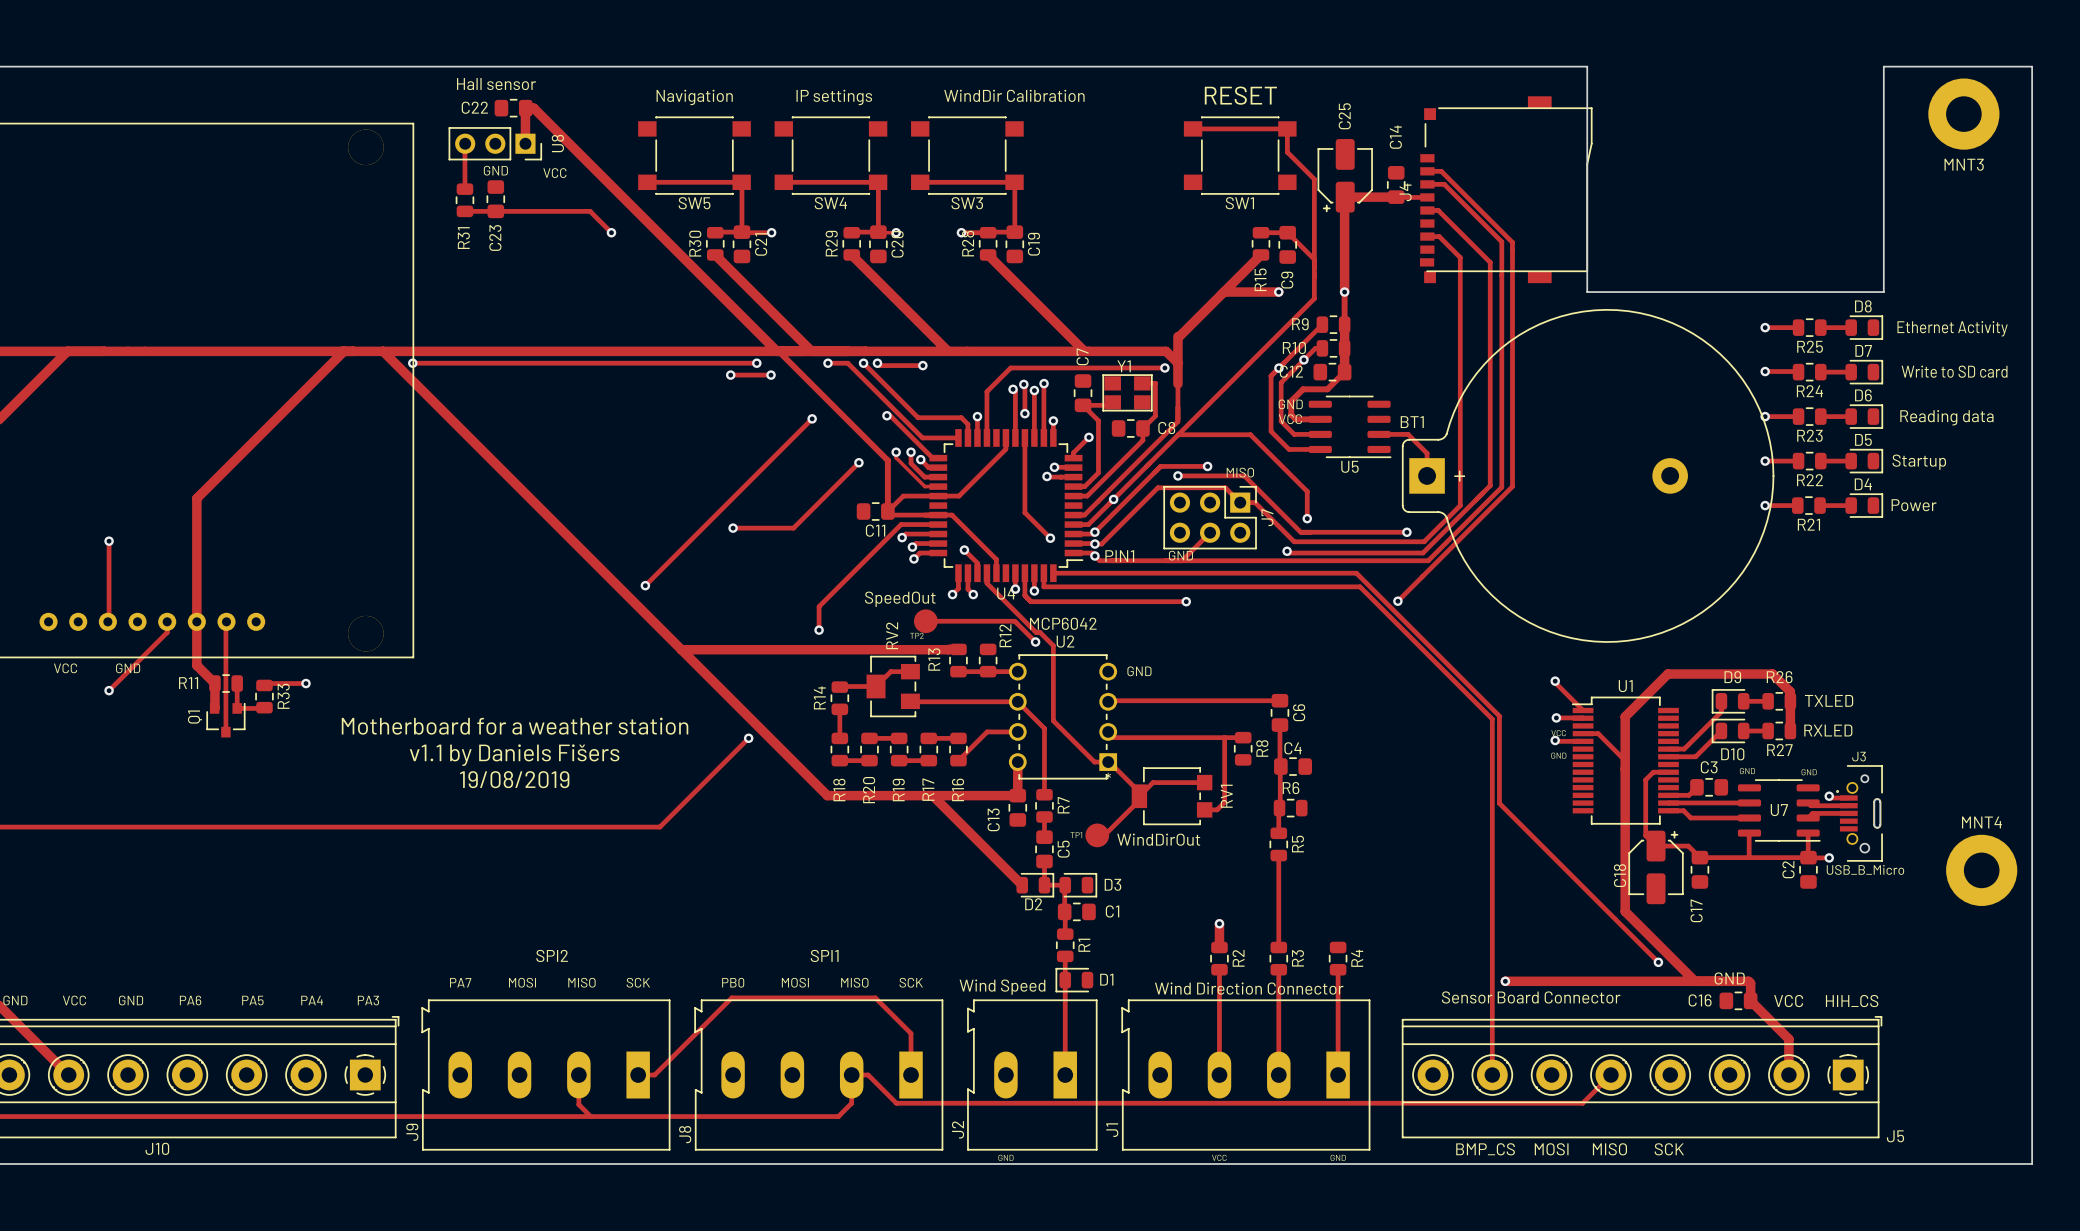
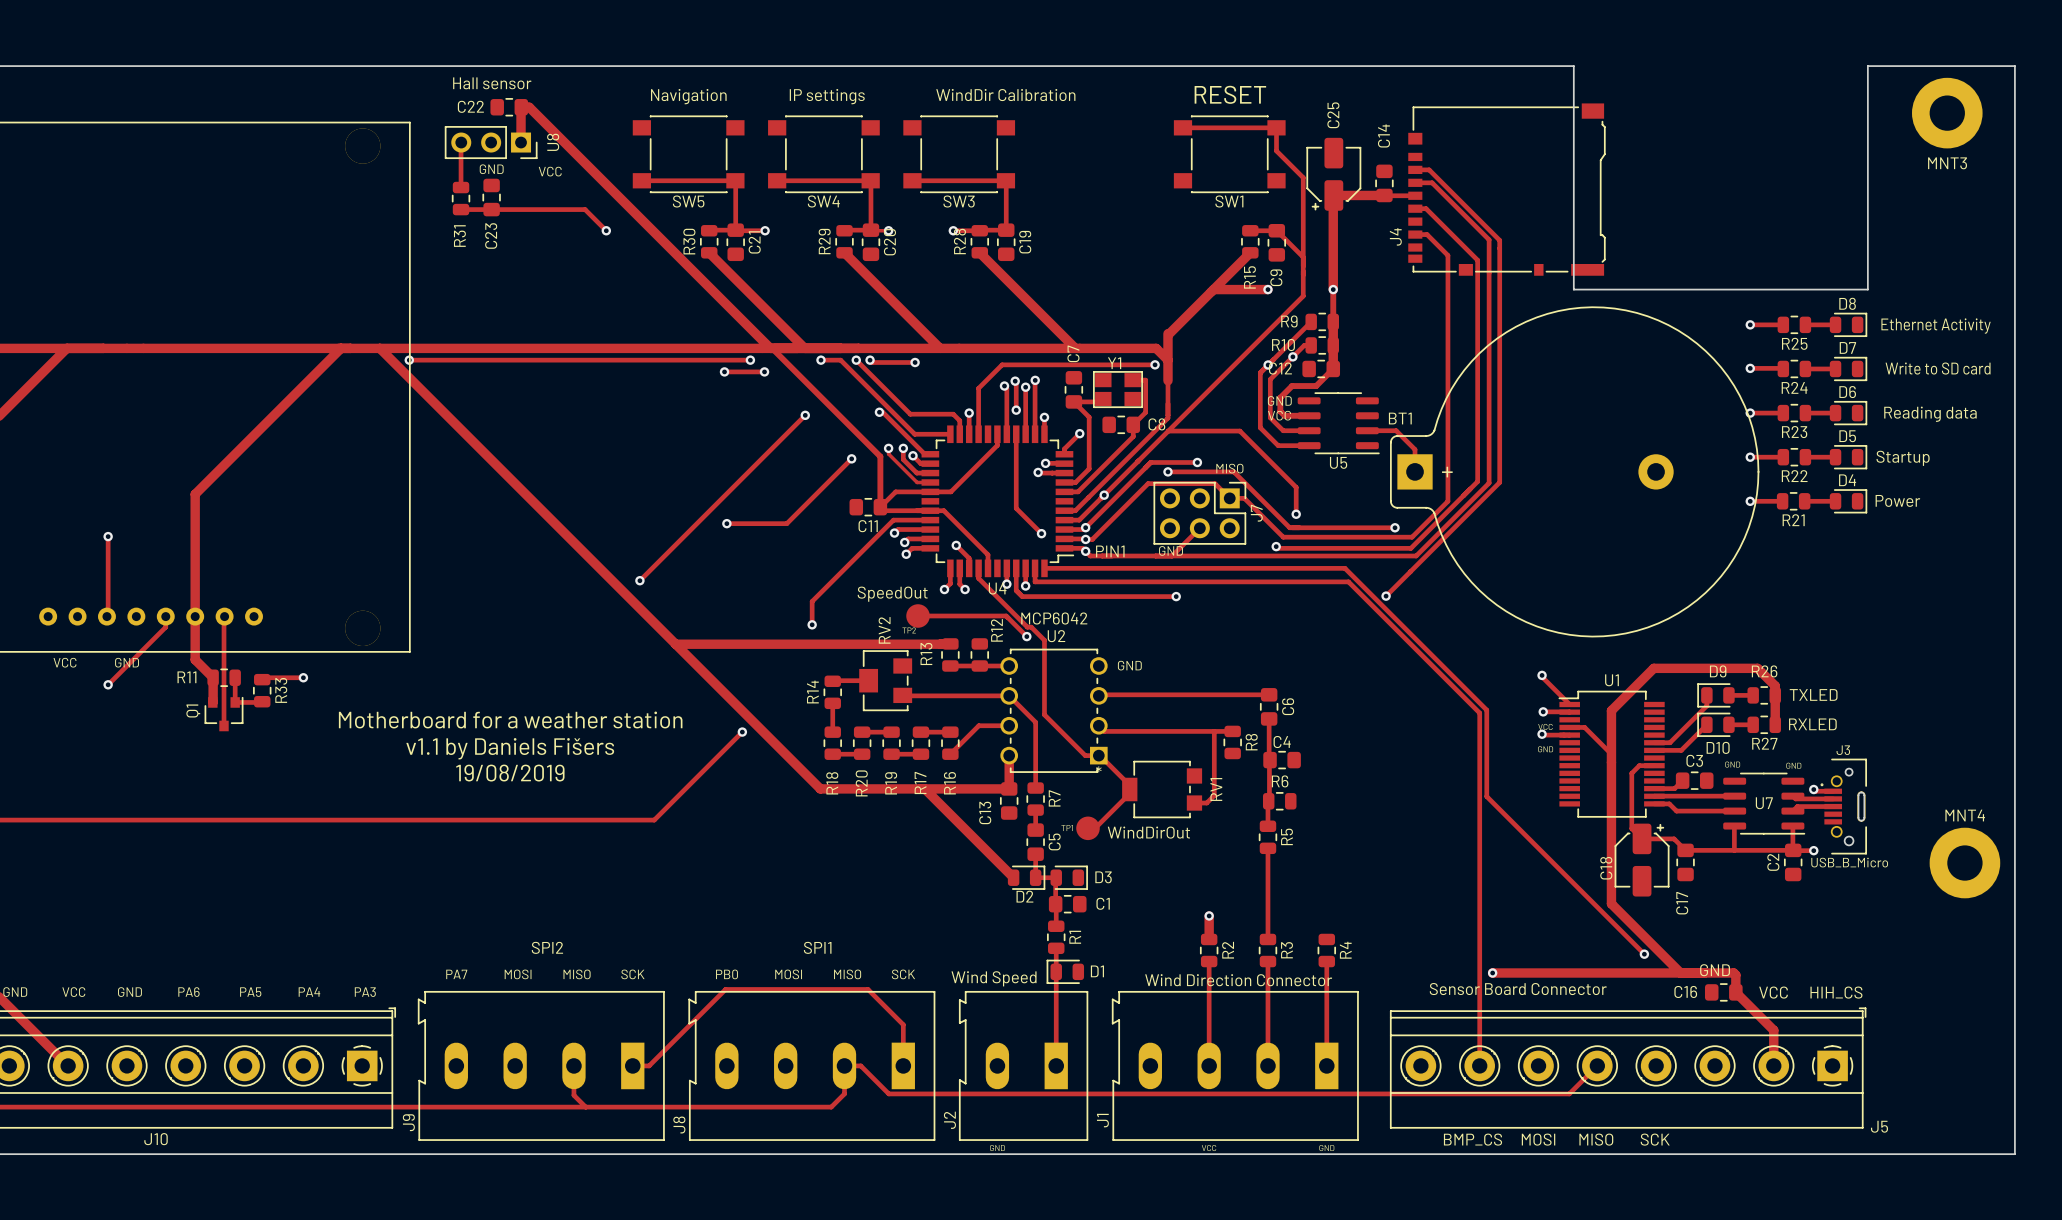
J4 footprint: [1419, 96, 1593, 284] -> [1408, 103, 1606, 276]
J4 name position: J4 (1405, 192) -> J4 (1395, 236)
track: (910, 671) (890, 671) (876, 686) -> none
track: (1204, 782) (1153, 782) (1139, 796) -> none

